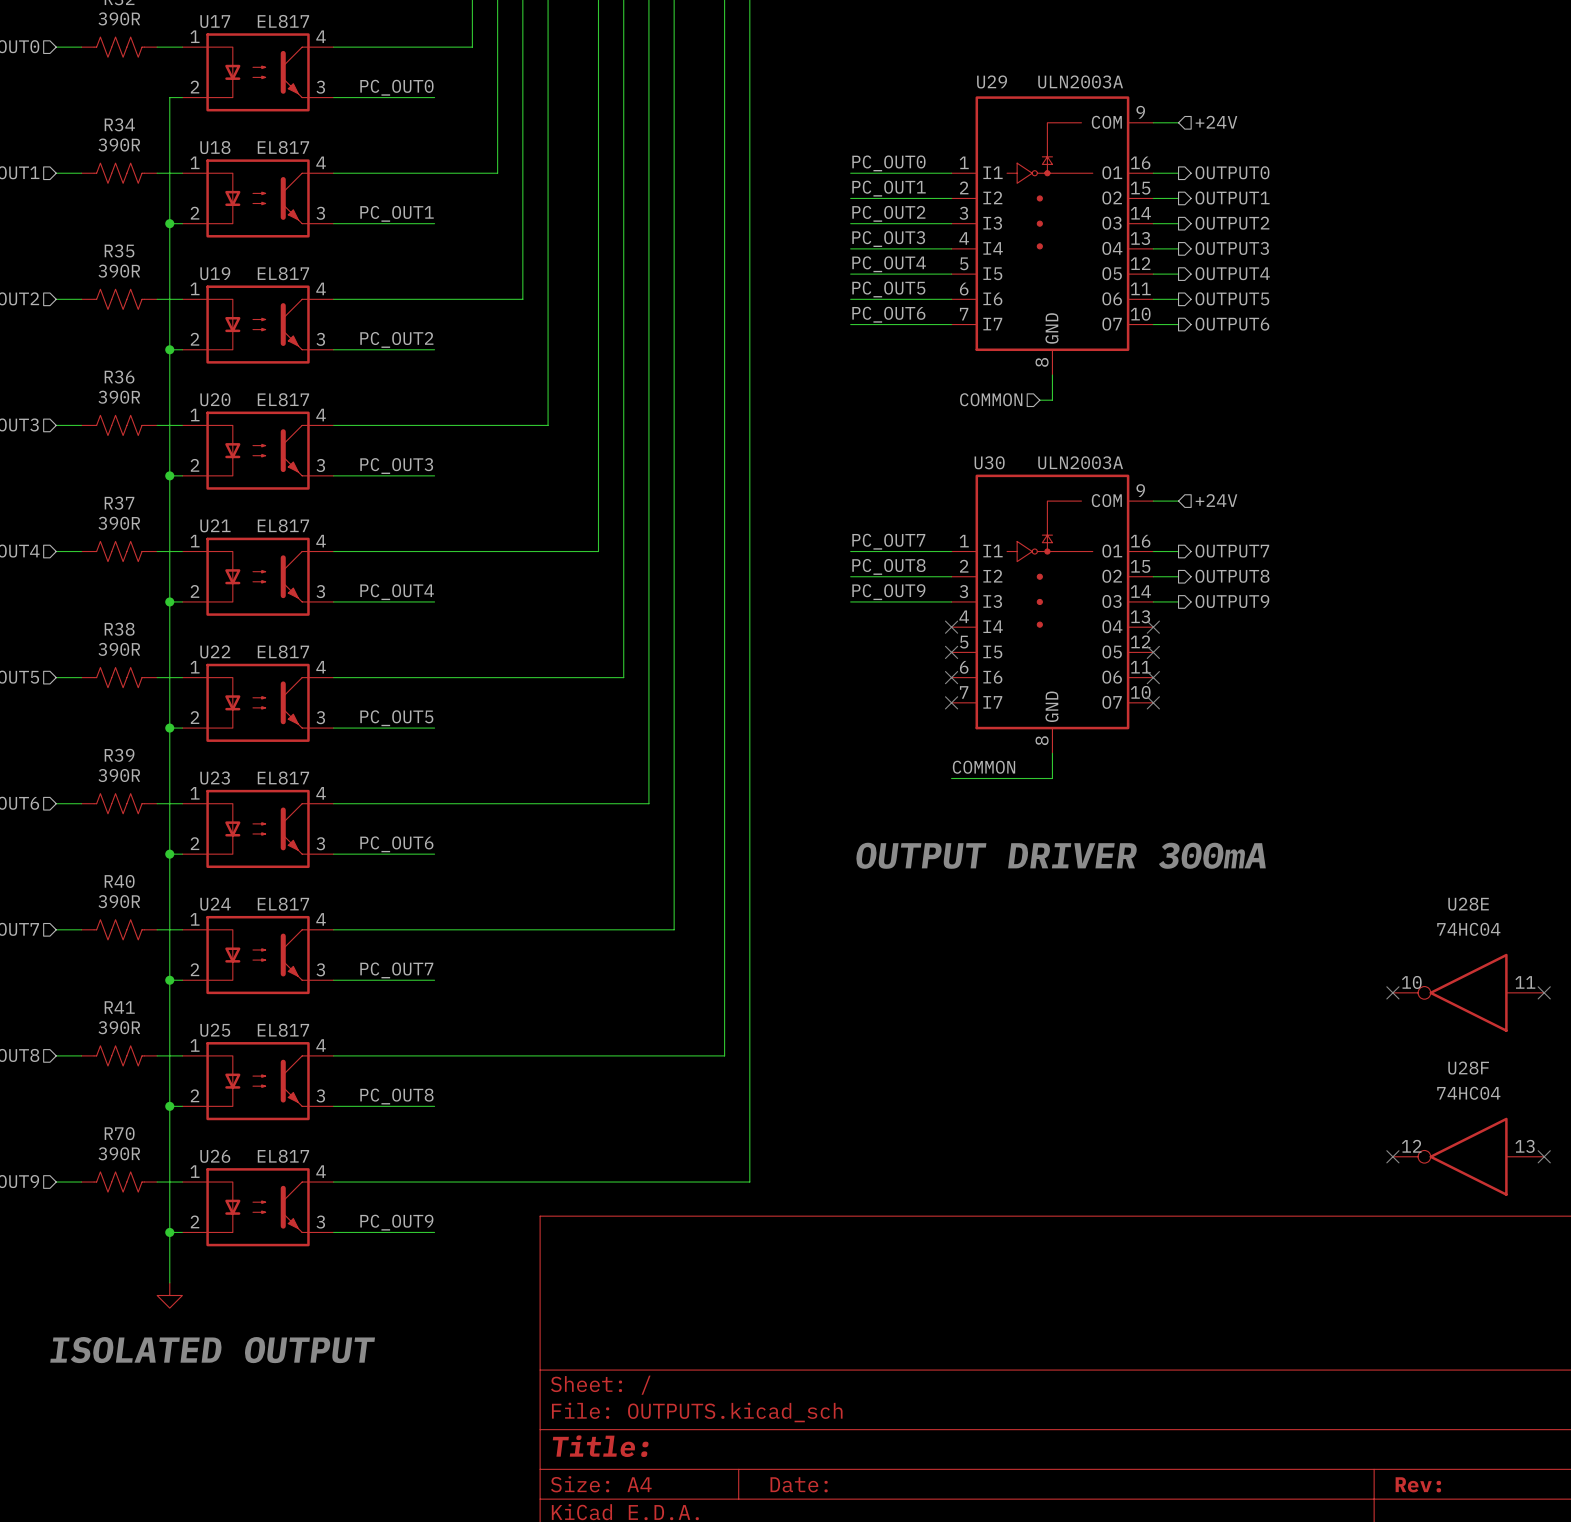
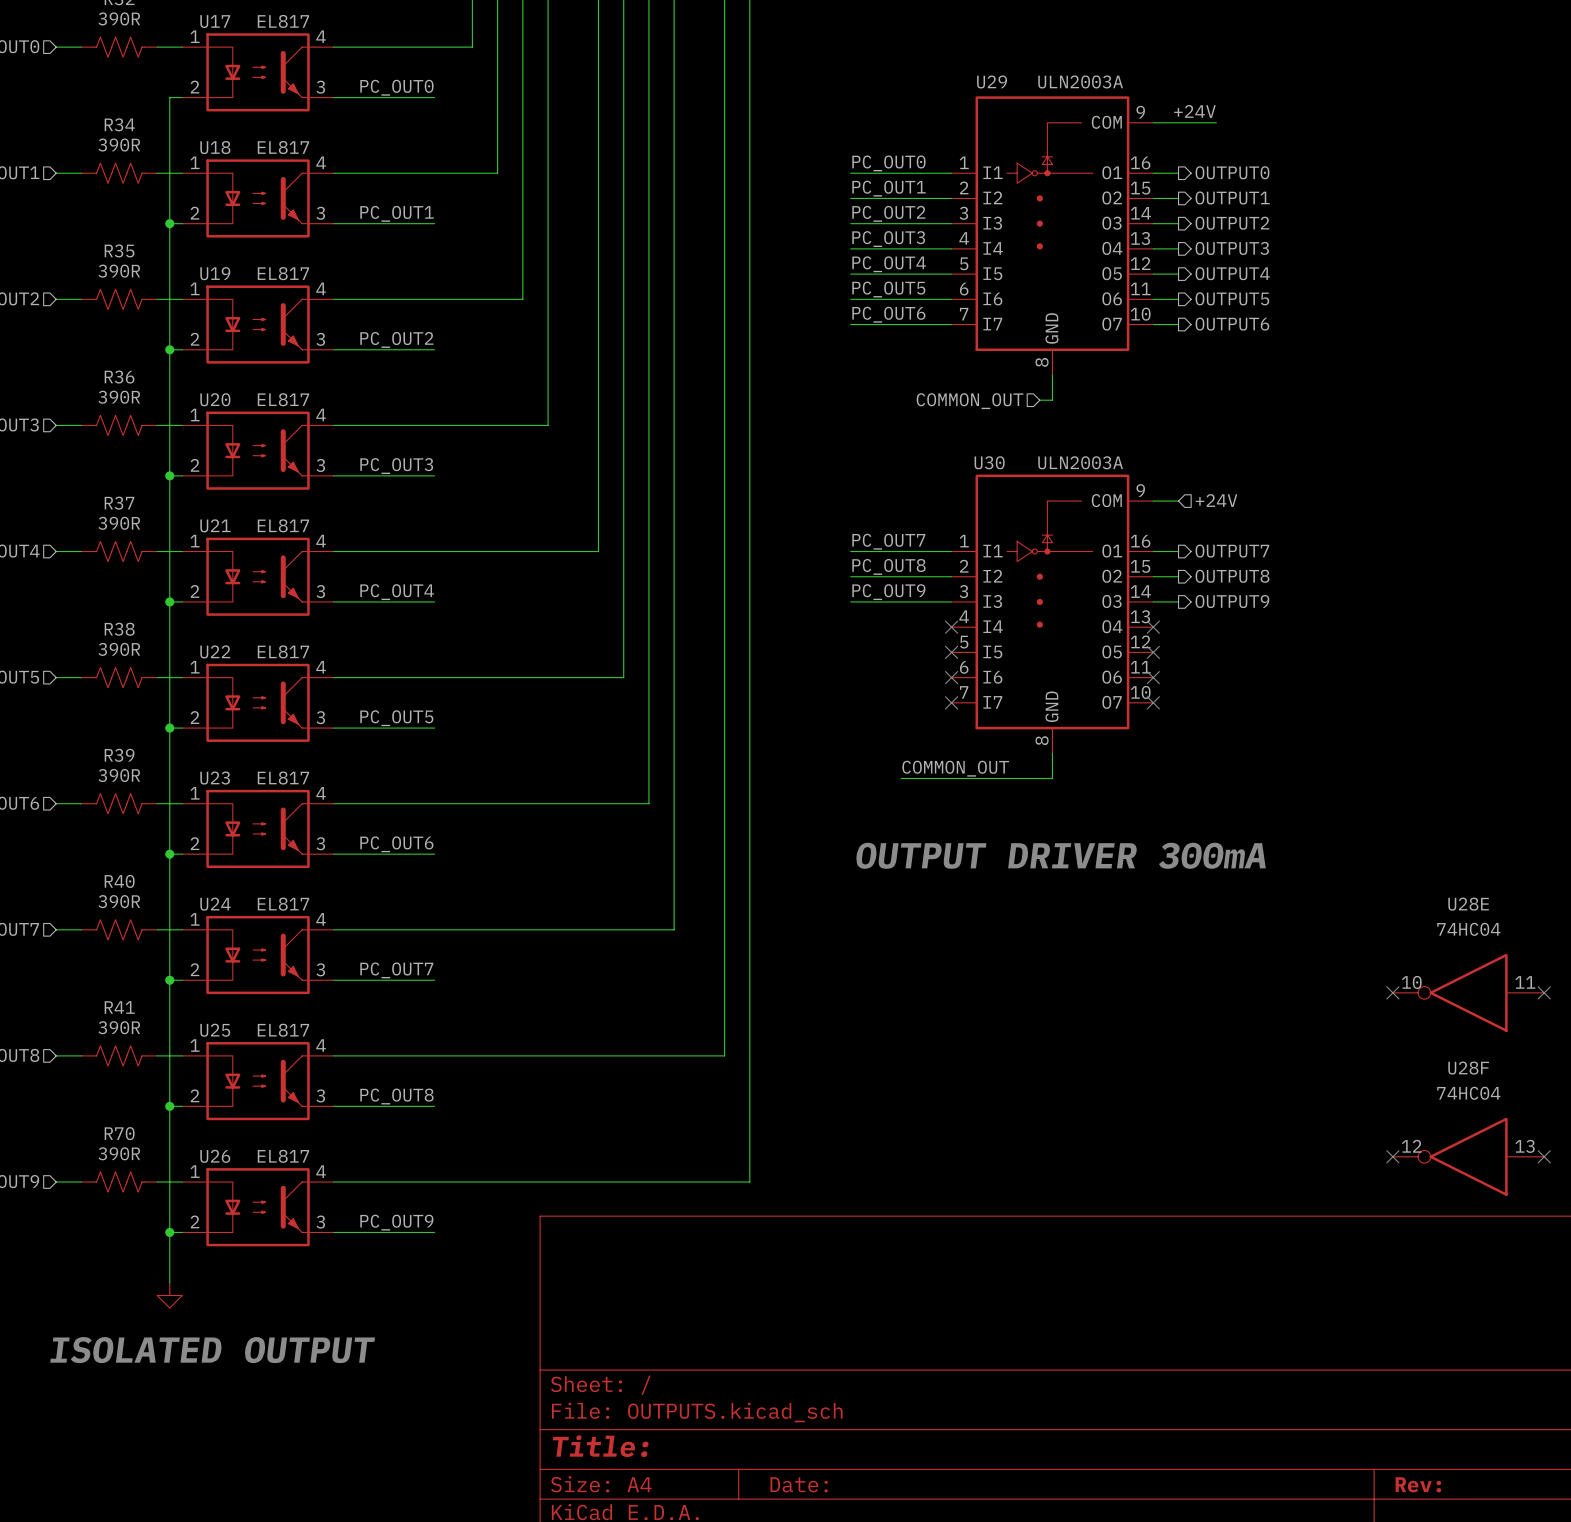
label: none -> +24V (1194, 111)
wire: none -> (1178, 122) (1216, 122)
hierarchical label: +24V (1216, 122) -> none
hierarchical label: COMMON (991, 399) -> COMMON_OUT (970, 401)
label: COMMON (984, 767) -> COMMON_OUT (955, 768)
wire: none -> (901, 778) (951, 778)

